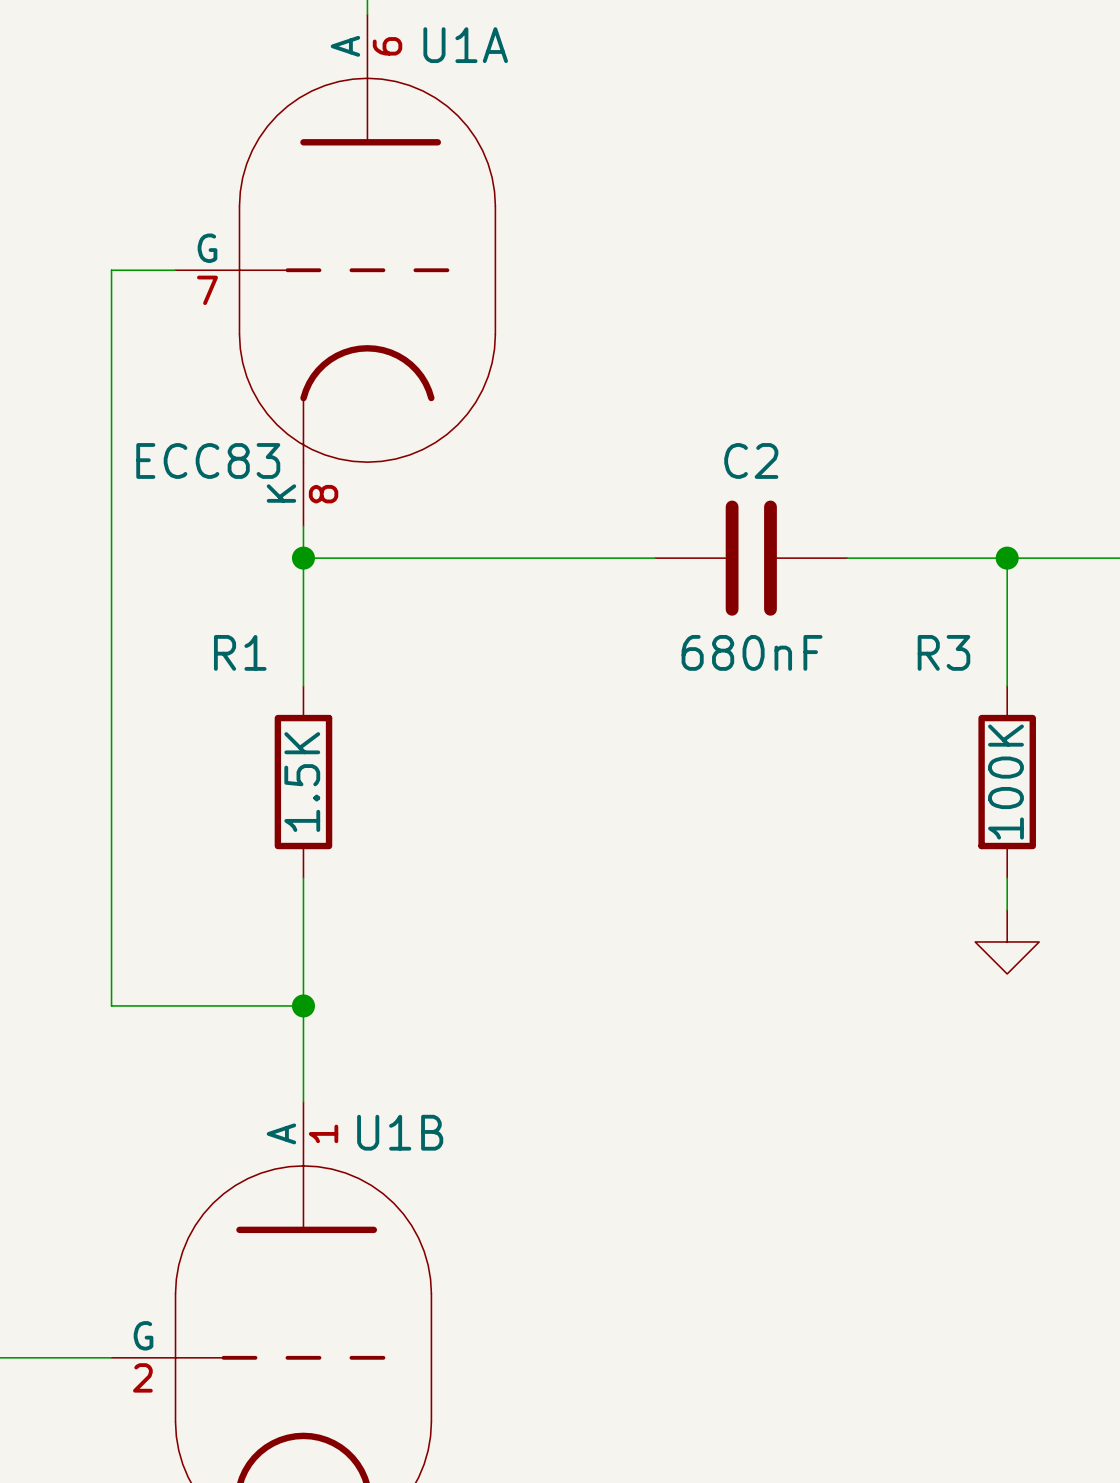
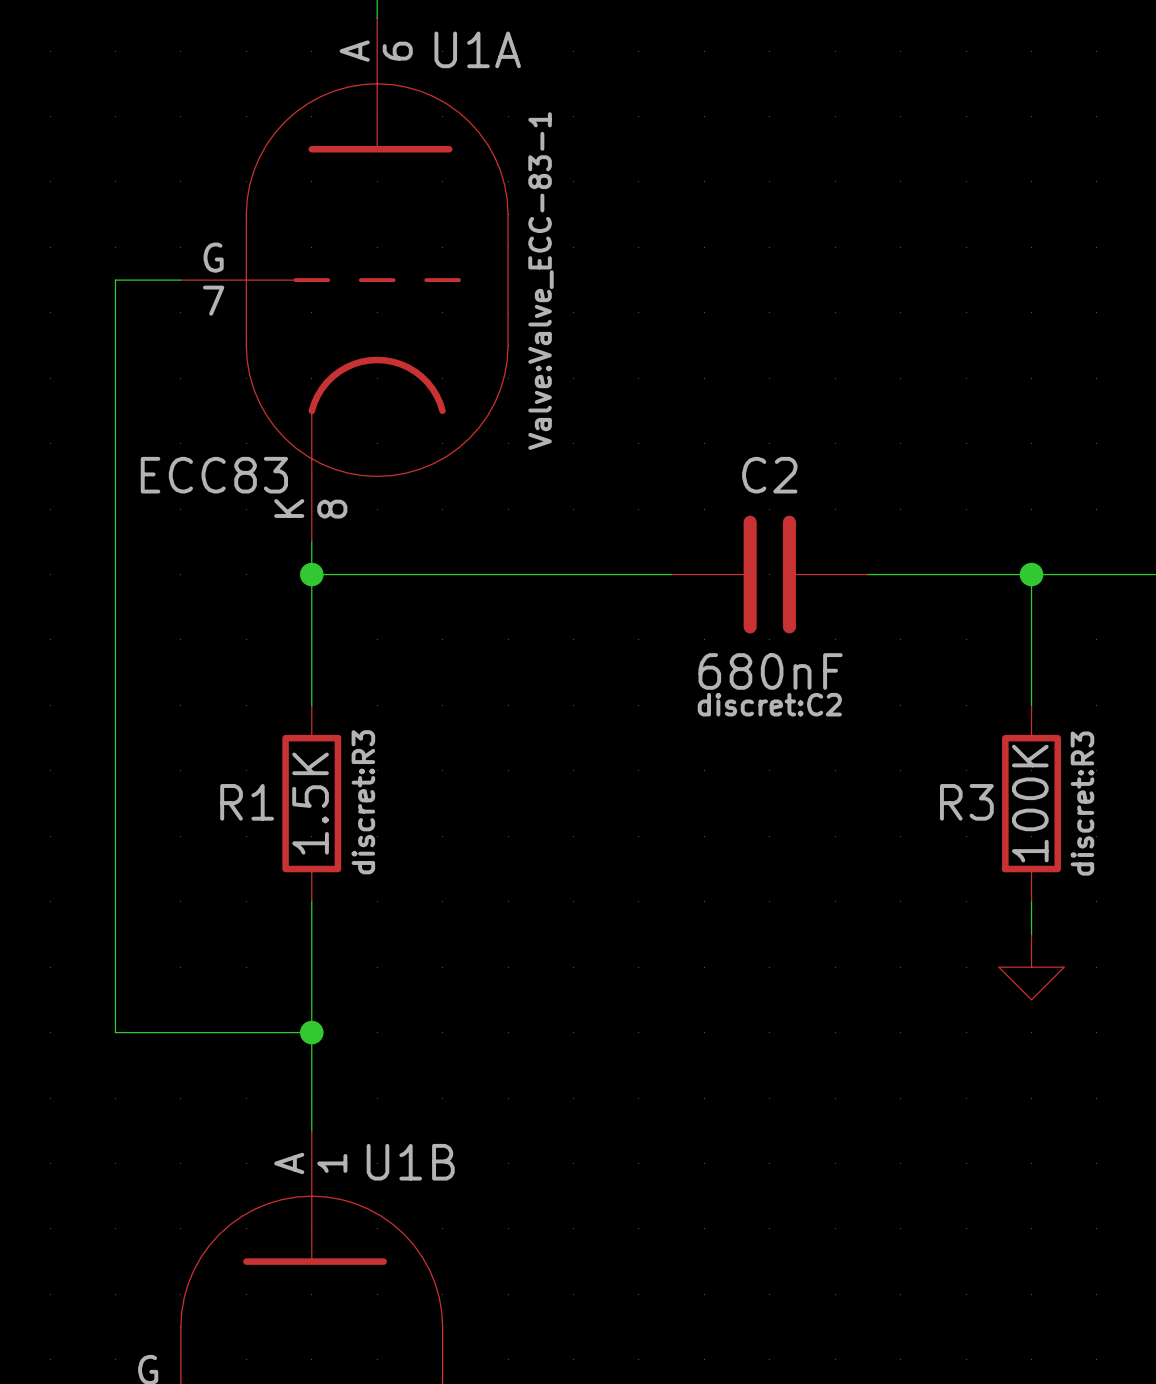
U1A text: none -> Valve:Valve_ECC-83-1 (540, 281)
R1 name position: R1 (240, 652) -> R1 (247, 802)
R3 name position: R3 (943, 652) -> R3 (966, 802)
C2 text: none -> discret:C2 (769, 704)
R1 text: none -> discret:R3 (363, 802)
R3 text: none -> discret:R3 (1082, 803)

